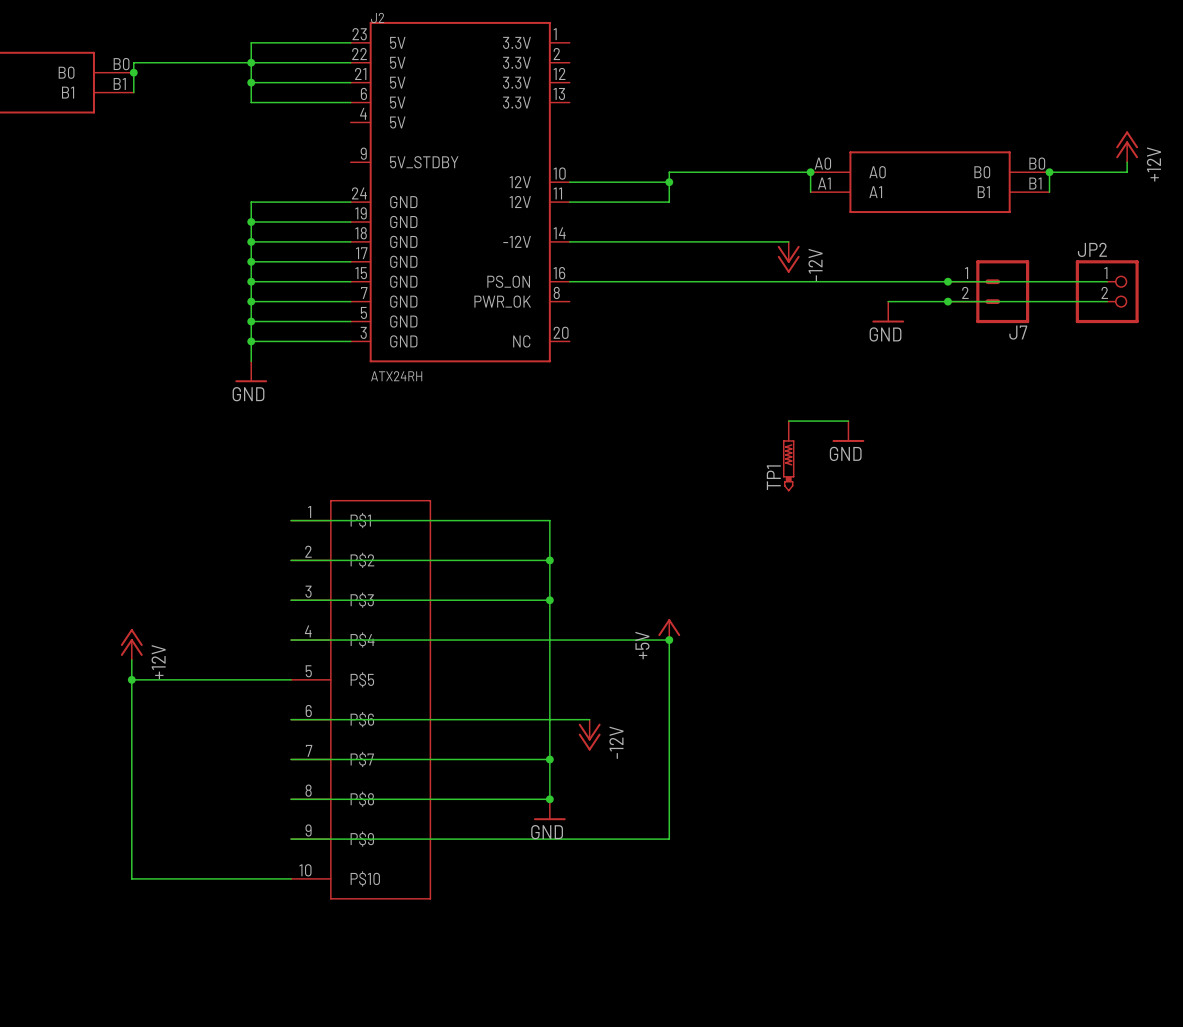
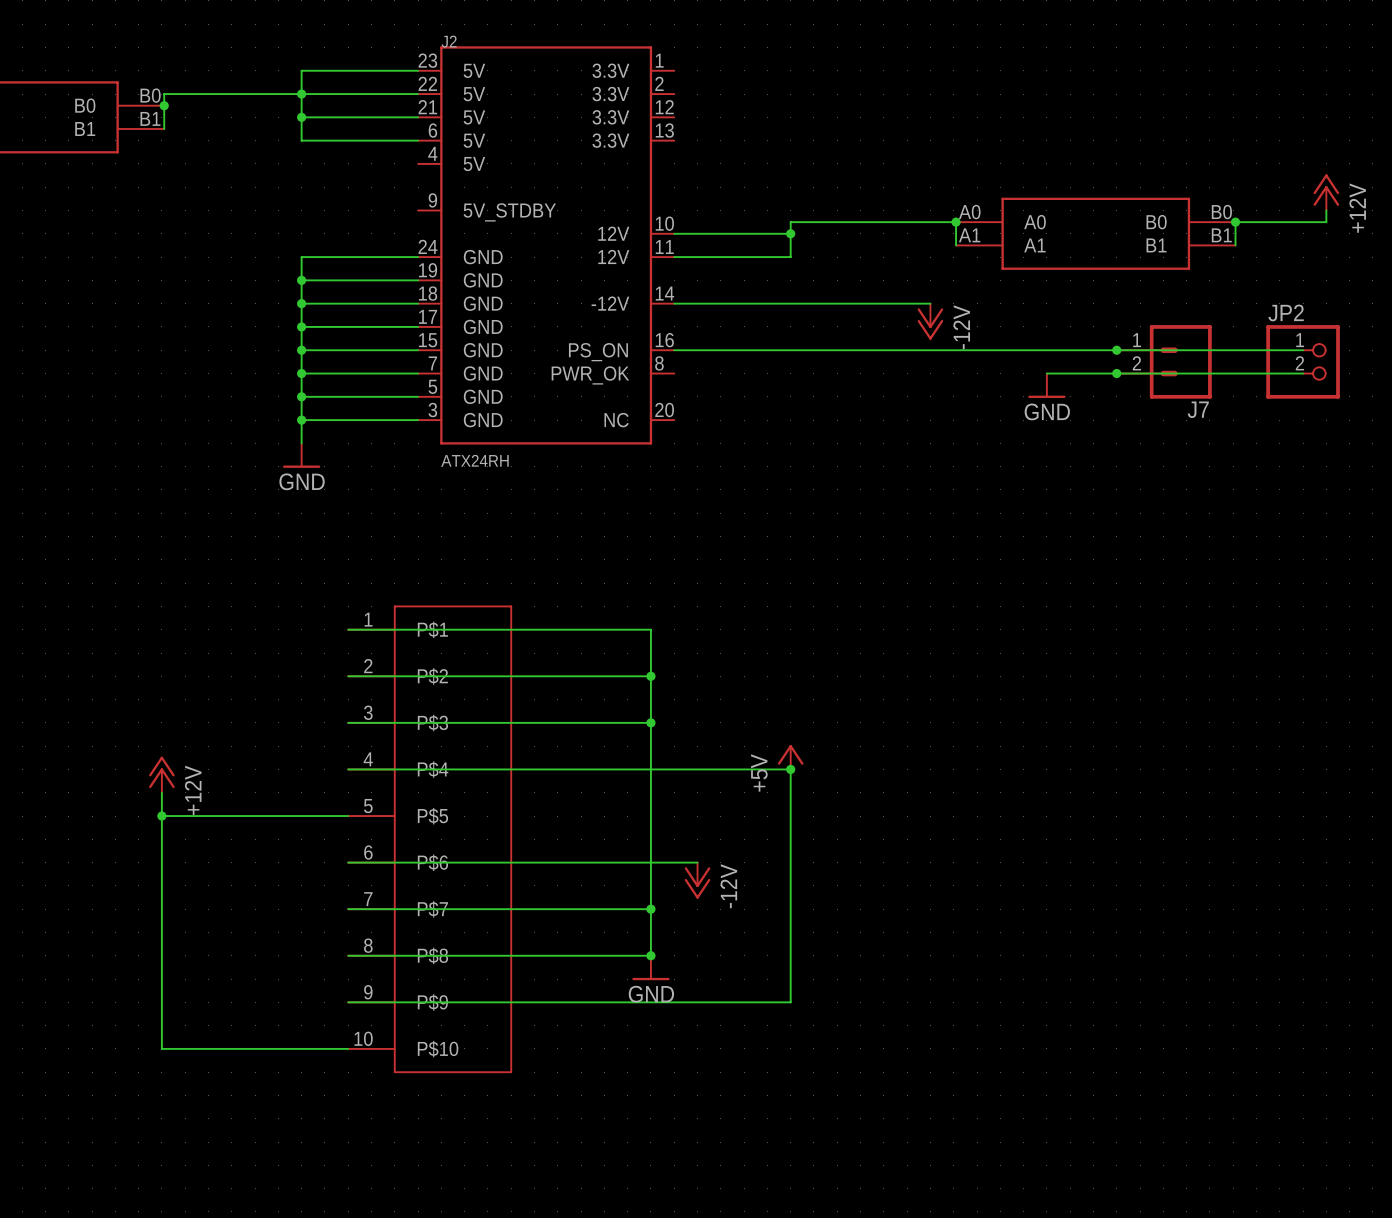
wire: (788, 421) (848, 421) -> none
power symbol: GND (848, 431) -> none
TP1: (788, 456) -> none

